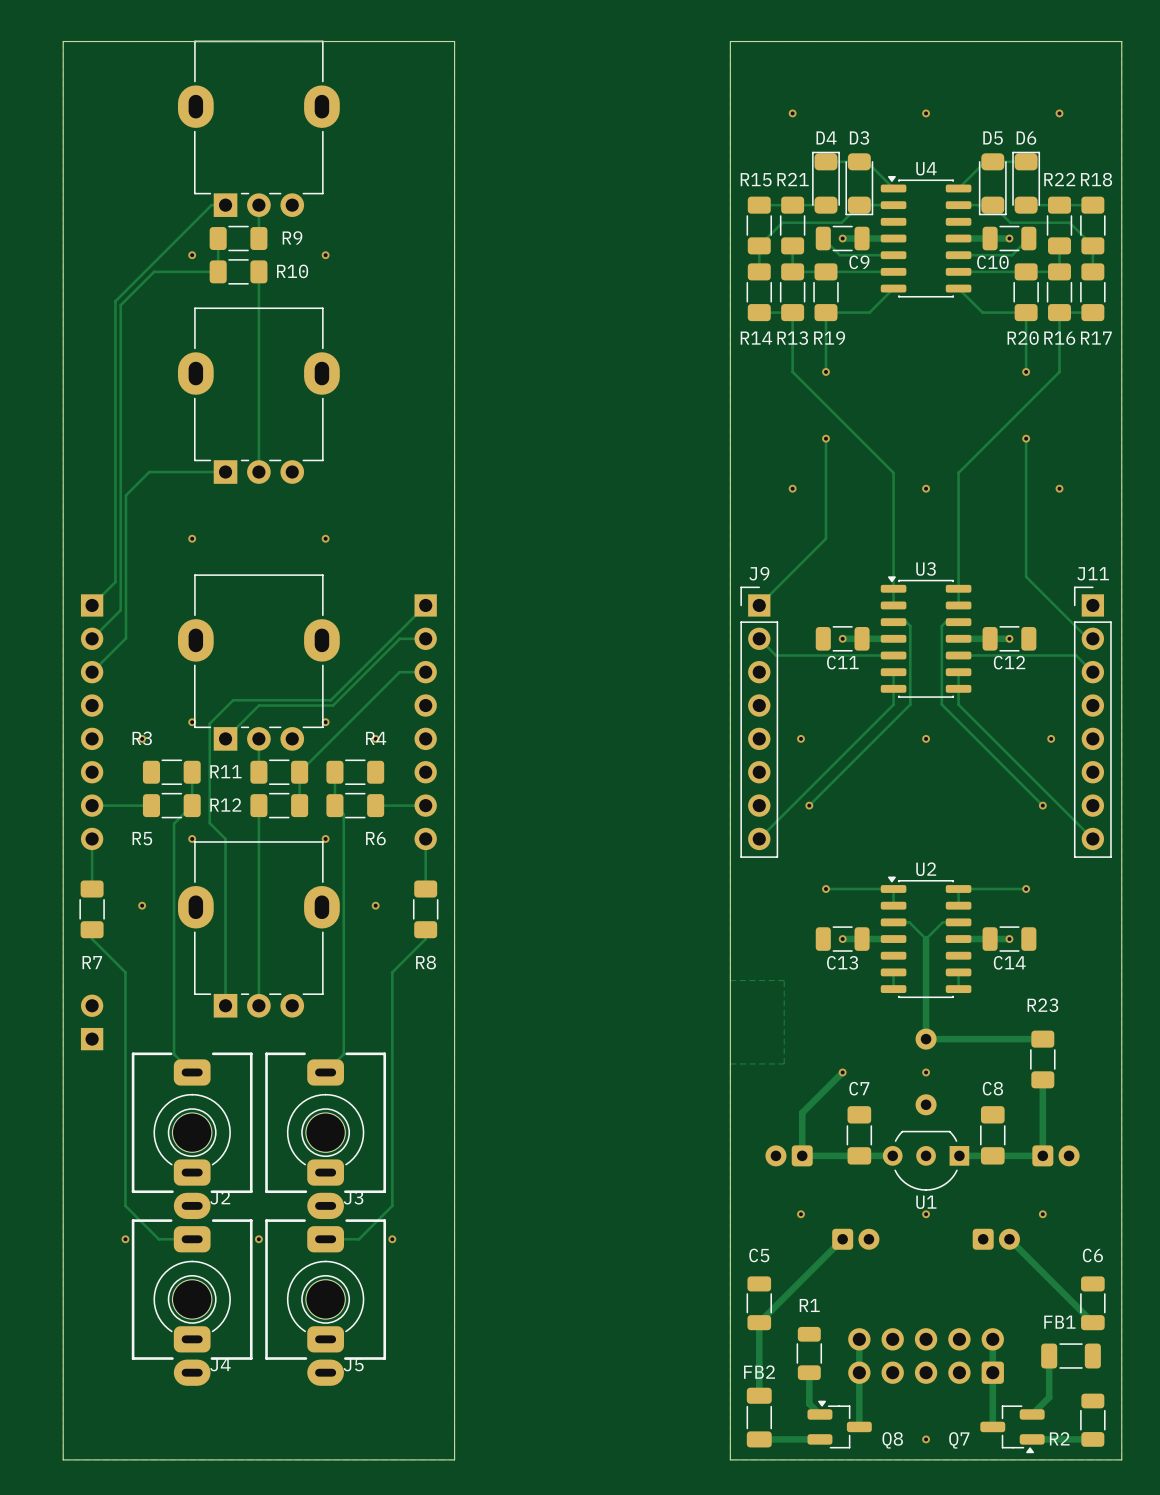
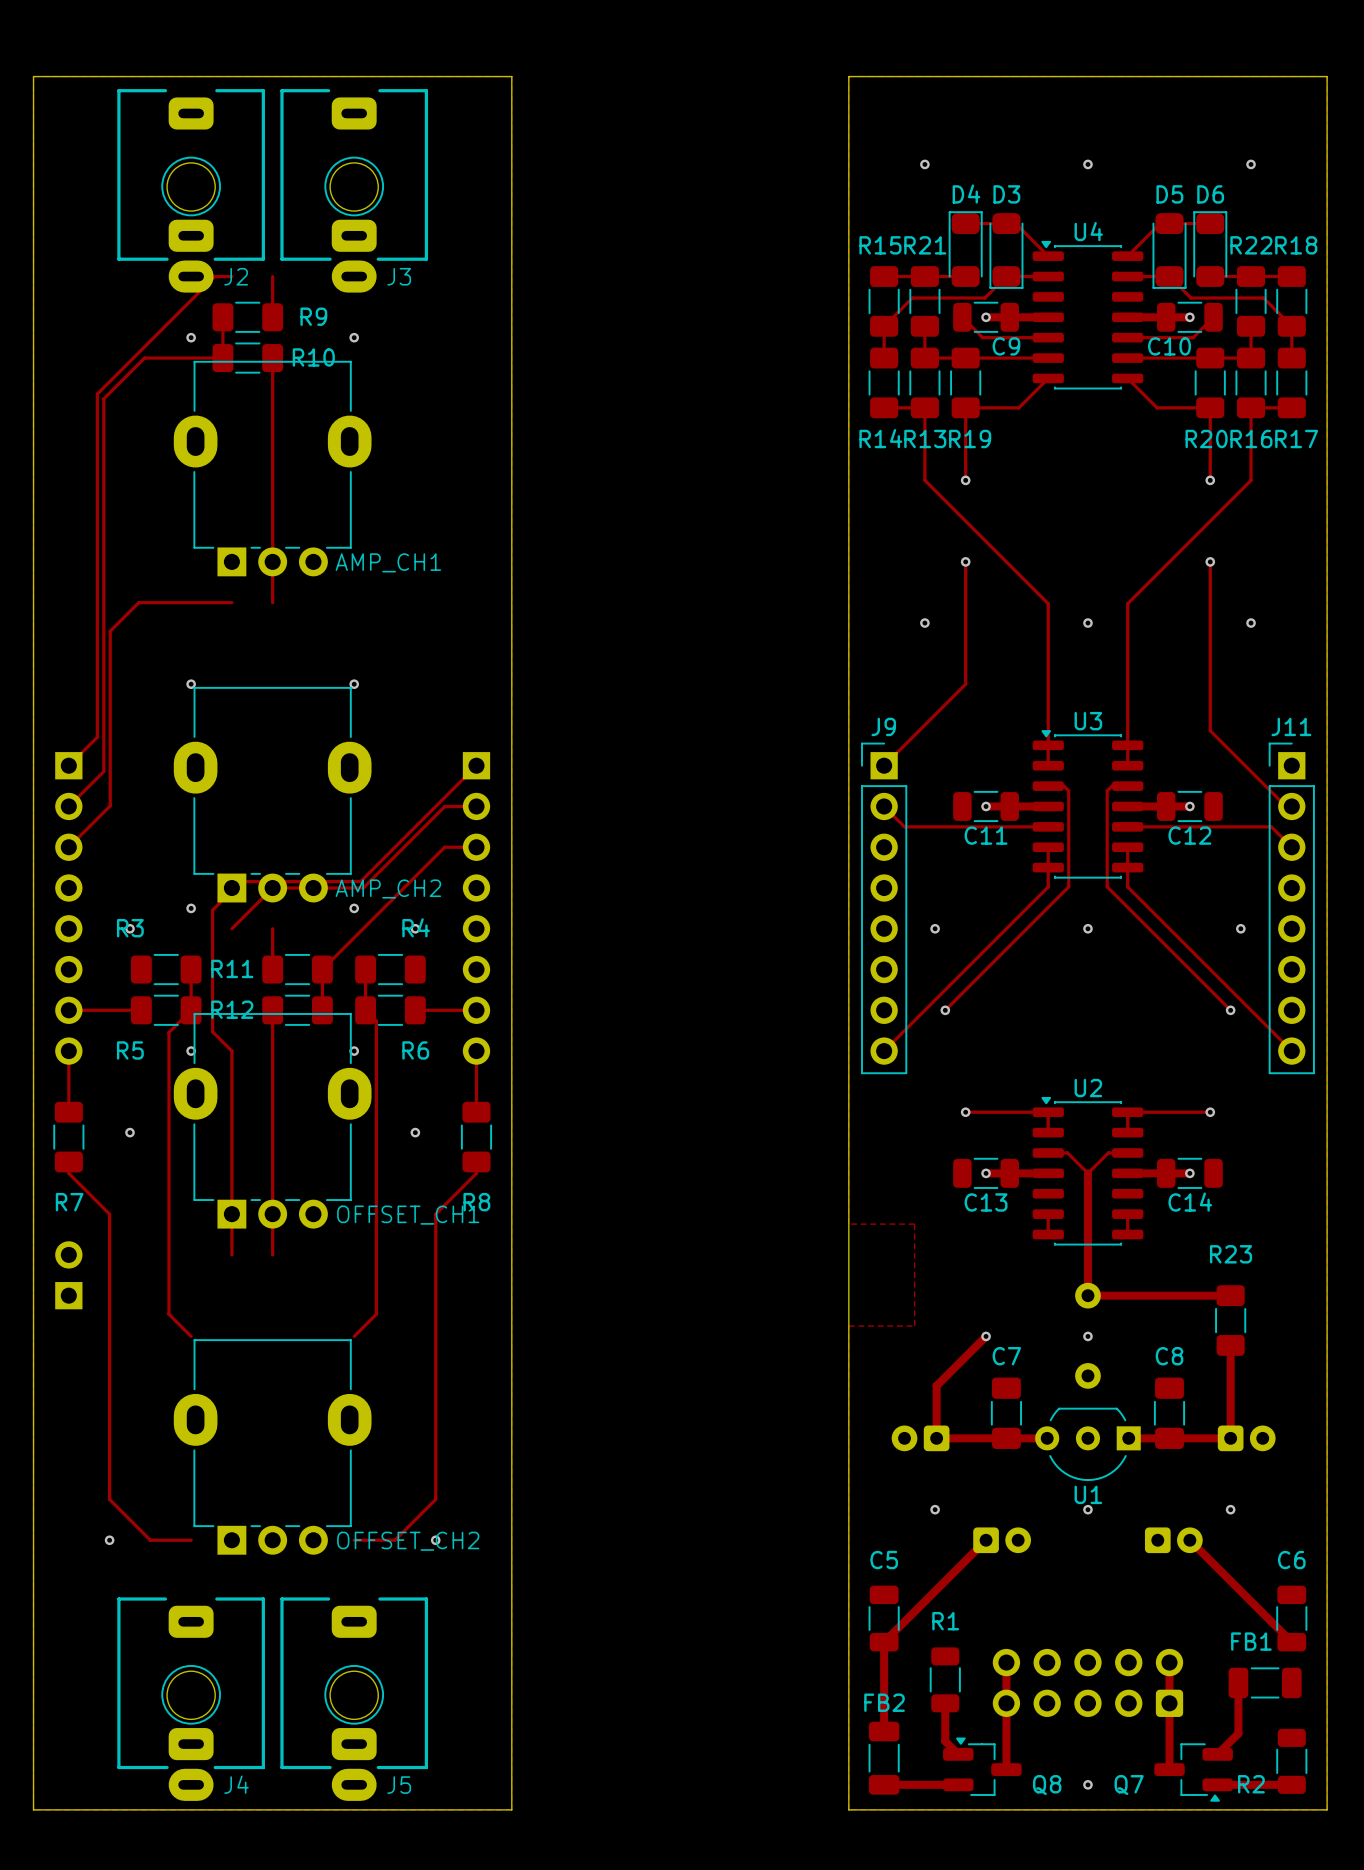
part: (258, 128) -> none
AMP_CH1: none -> (272, 468)
part: (258, 395) -> none
AMP_CH2: none -> (272, 794)
part: (258, 662) -> none
OFFSET_CH1: none -> (272, 1120)
part: (258, 929) -> none
J2 footprint: [131, 1052, 253, 1220] -> [117, 89, 265, 293]
J3 footprint: [265, 1052, 387, 1220] -> [280, 89, 429, 293]
OFFSET_CH2: none -> (272, 1446)
J4 footprint: [131, 1219, 253, 1386] -> [117, 1597, 265, 1801]
J5 footprint: [265, 1219, 387, 1386] -> [280, 1597, 429, 1801]

